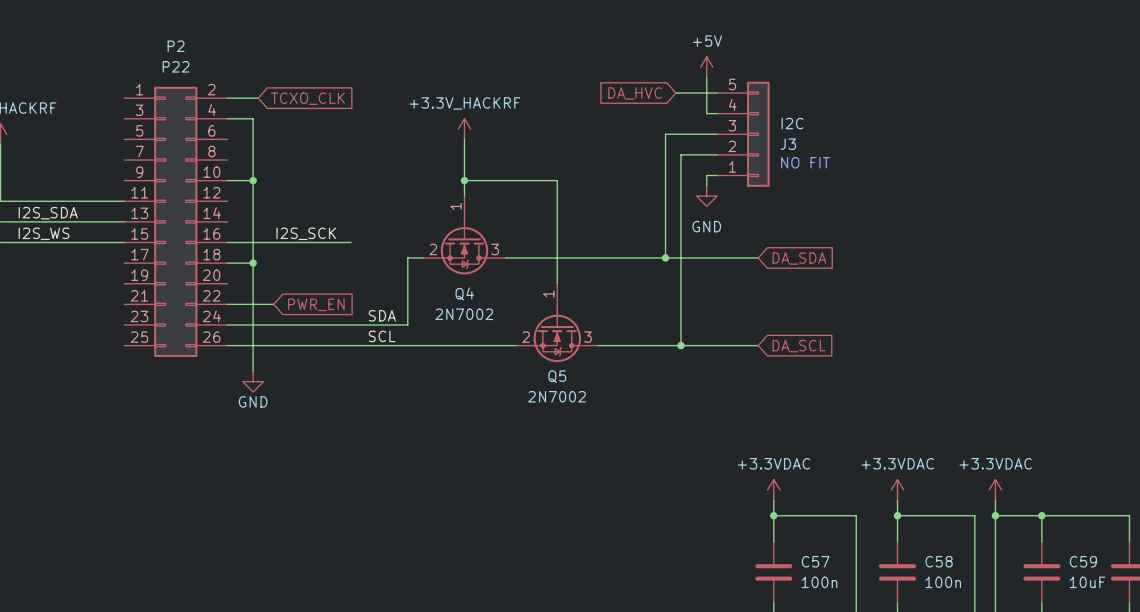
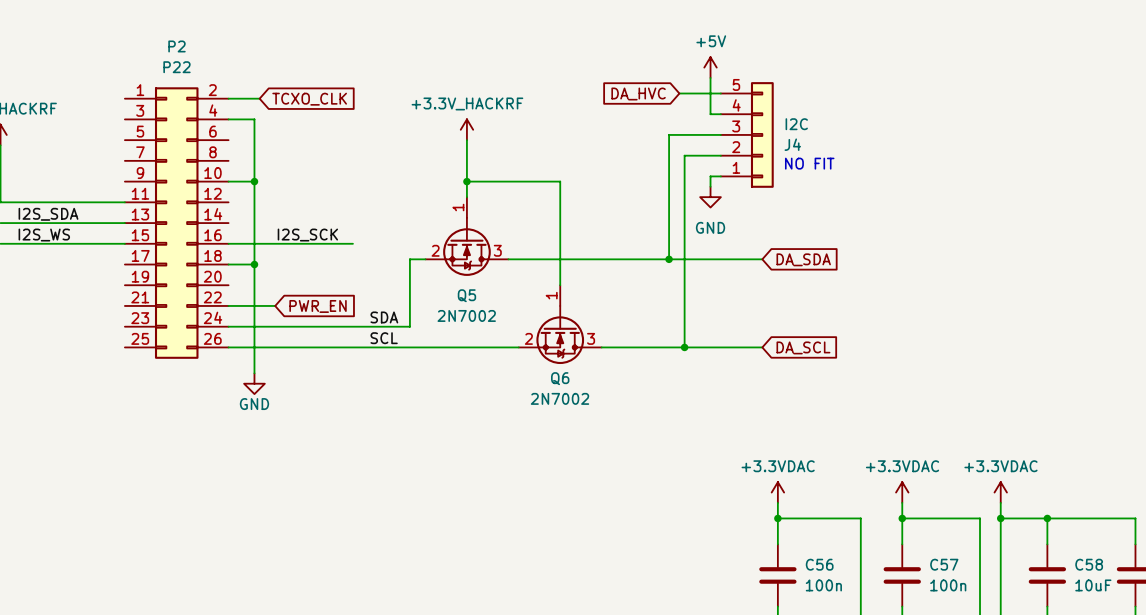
J3 name: J3 (788, 144) -> J4 (792, 144)
Q4 name: Q4 (464, 293) -> Q5 (466, 295)
Q5 name: Q5 (557, 376) -> Q6 (560, 378)
C57 name: C57 (815, 561) -> C56 (819, 564)
C58 name: C58 (939, 561) -> C57 (944, 564)
C59 name: C59 (1083, 561) -> C58 (1089, 564)

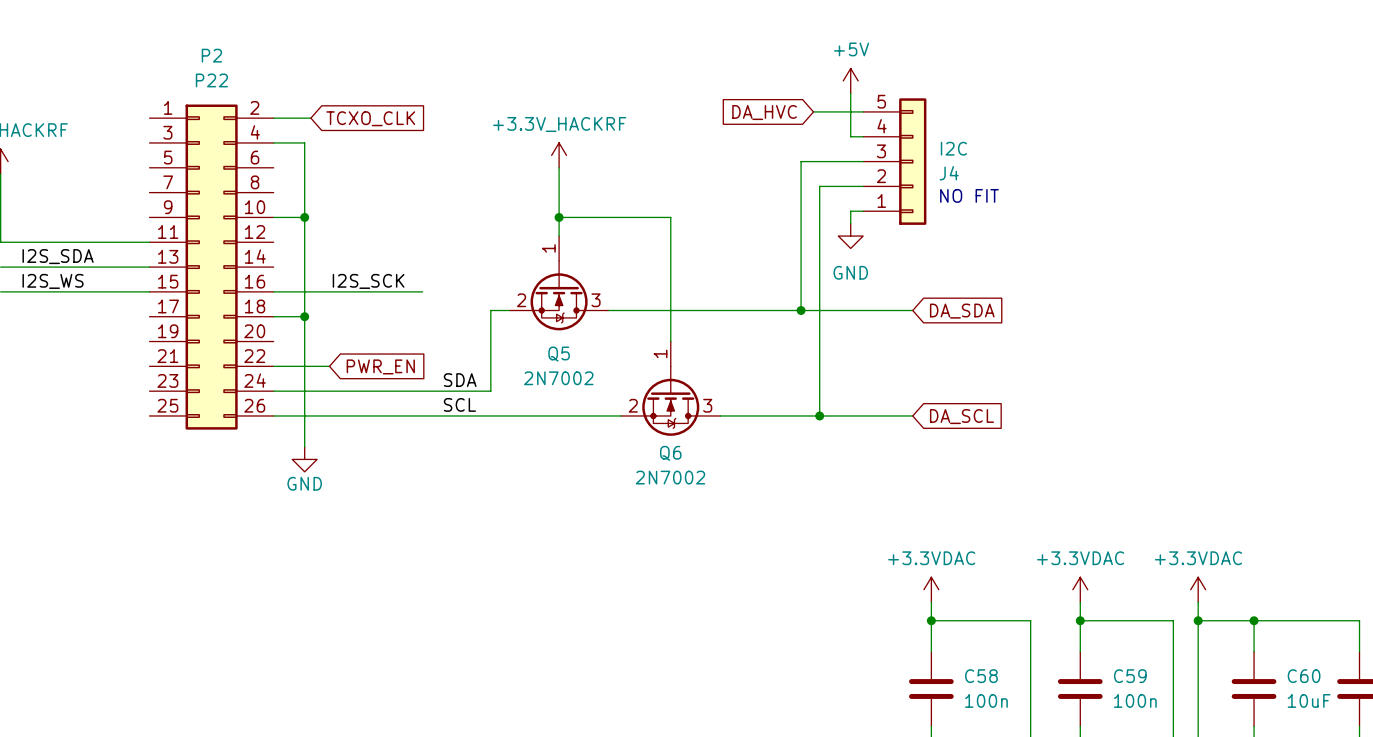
C56 name: C56 (819, 564) -> C58 (981, 676)
C57 name: C57 (944, 564) -> C59 (1130, 676)
C58 name: C58 (1089, 564) -> C60 (1304, 676)

